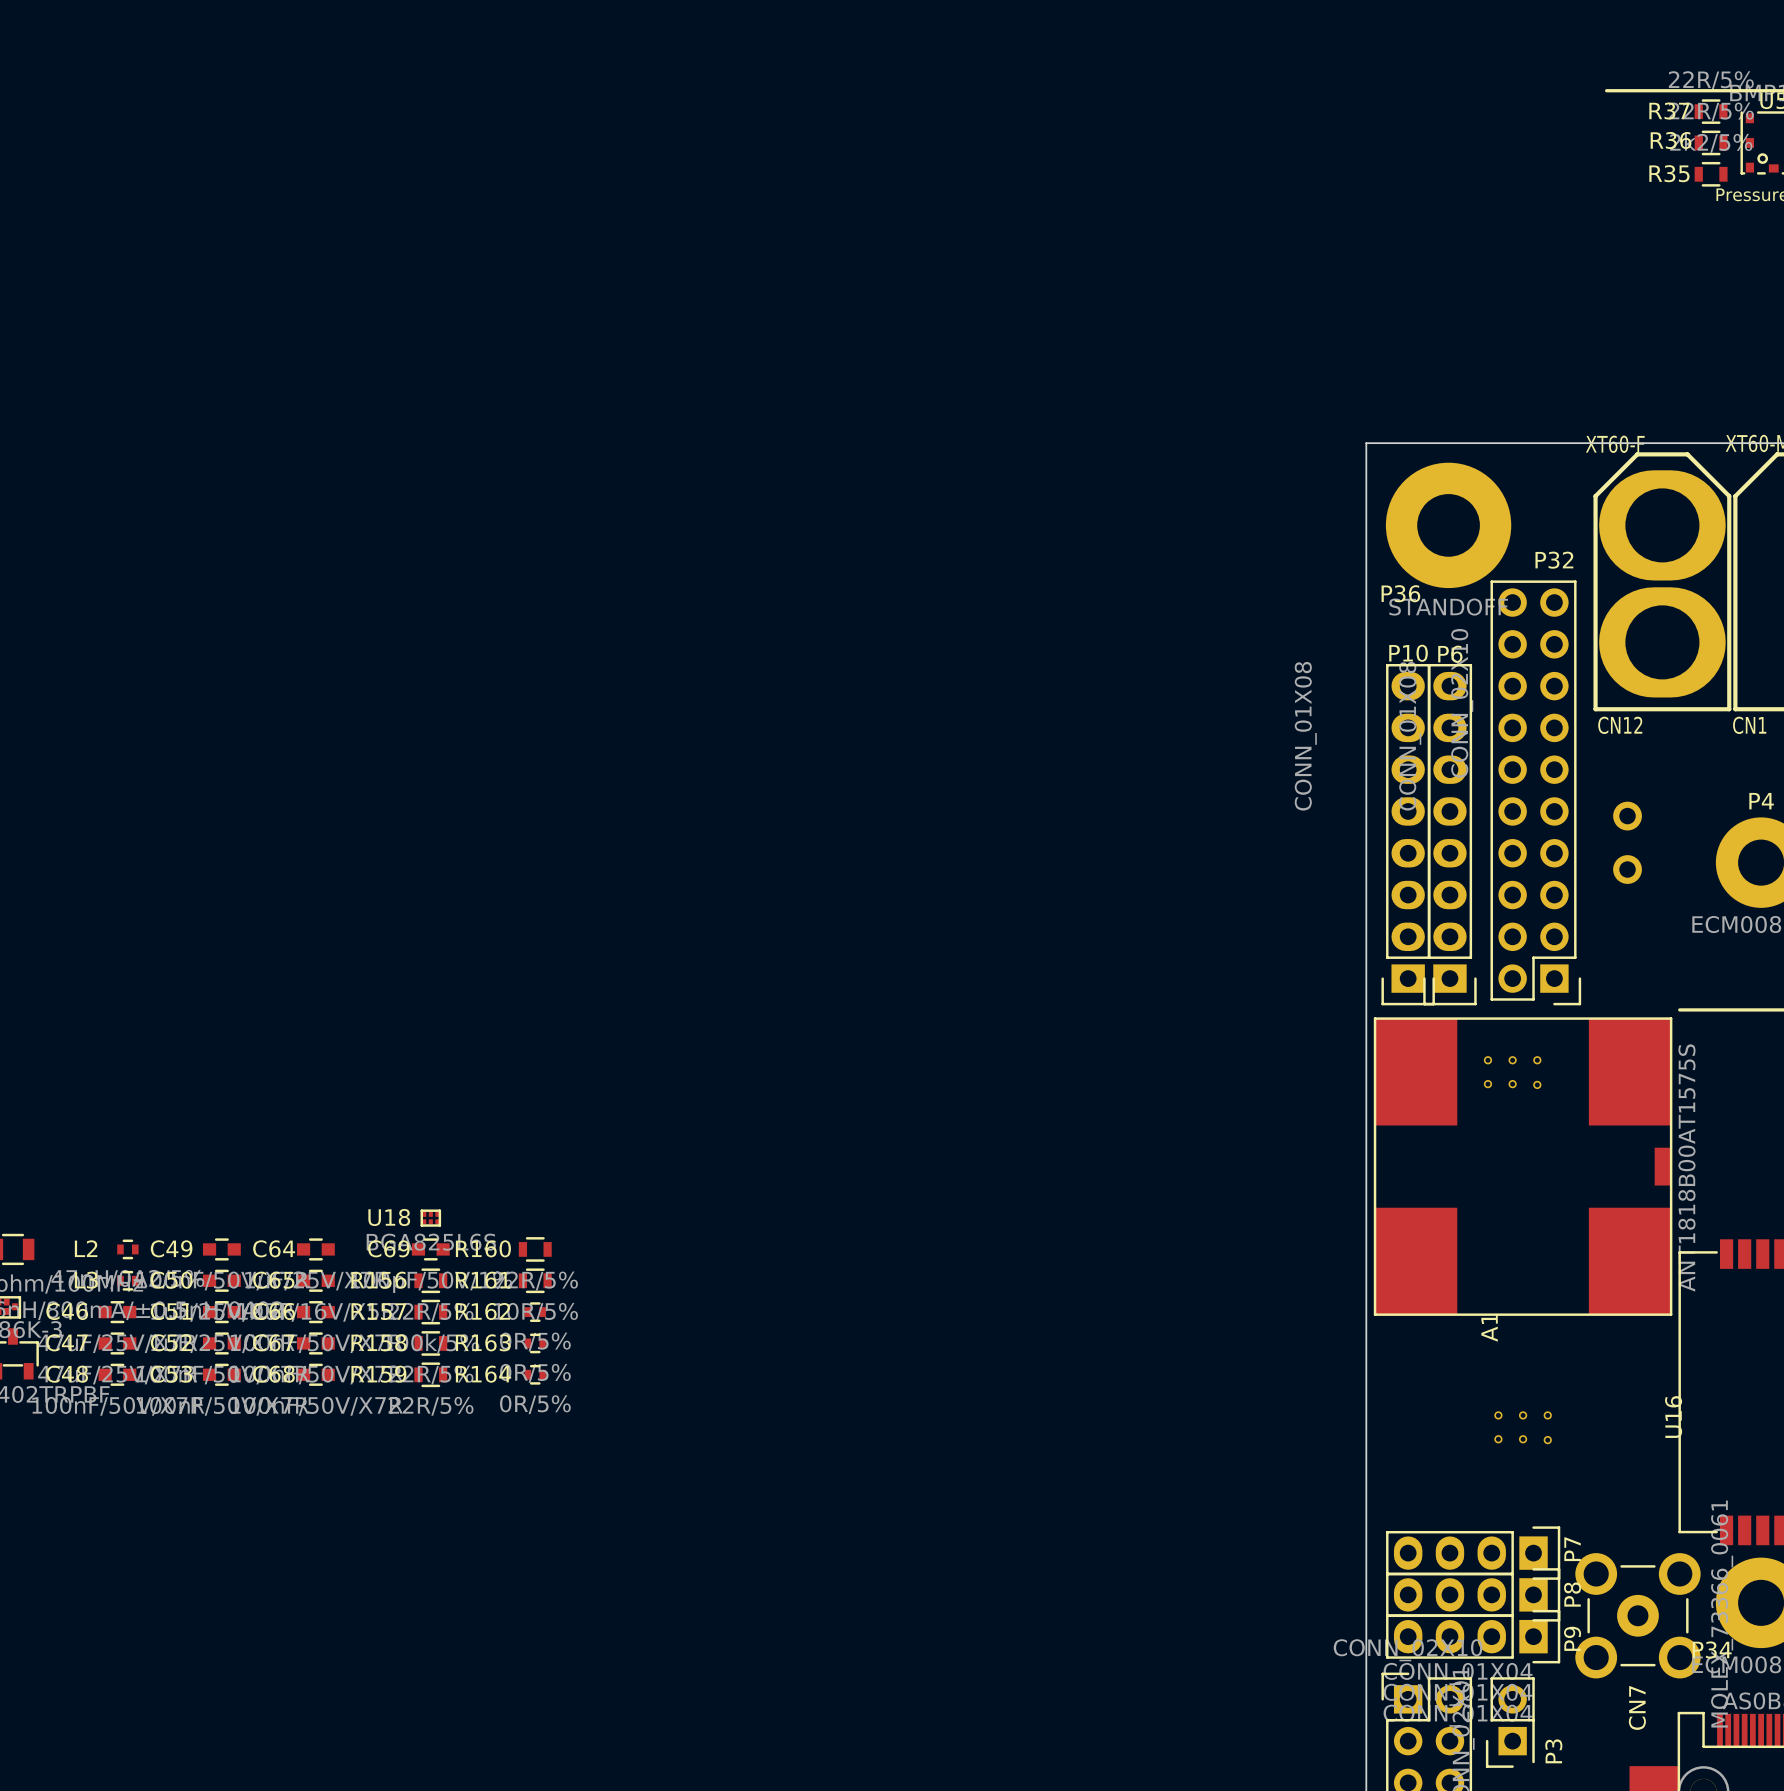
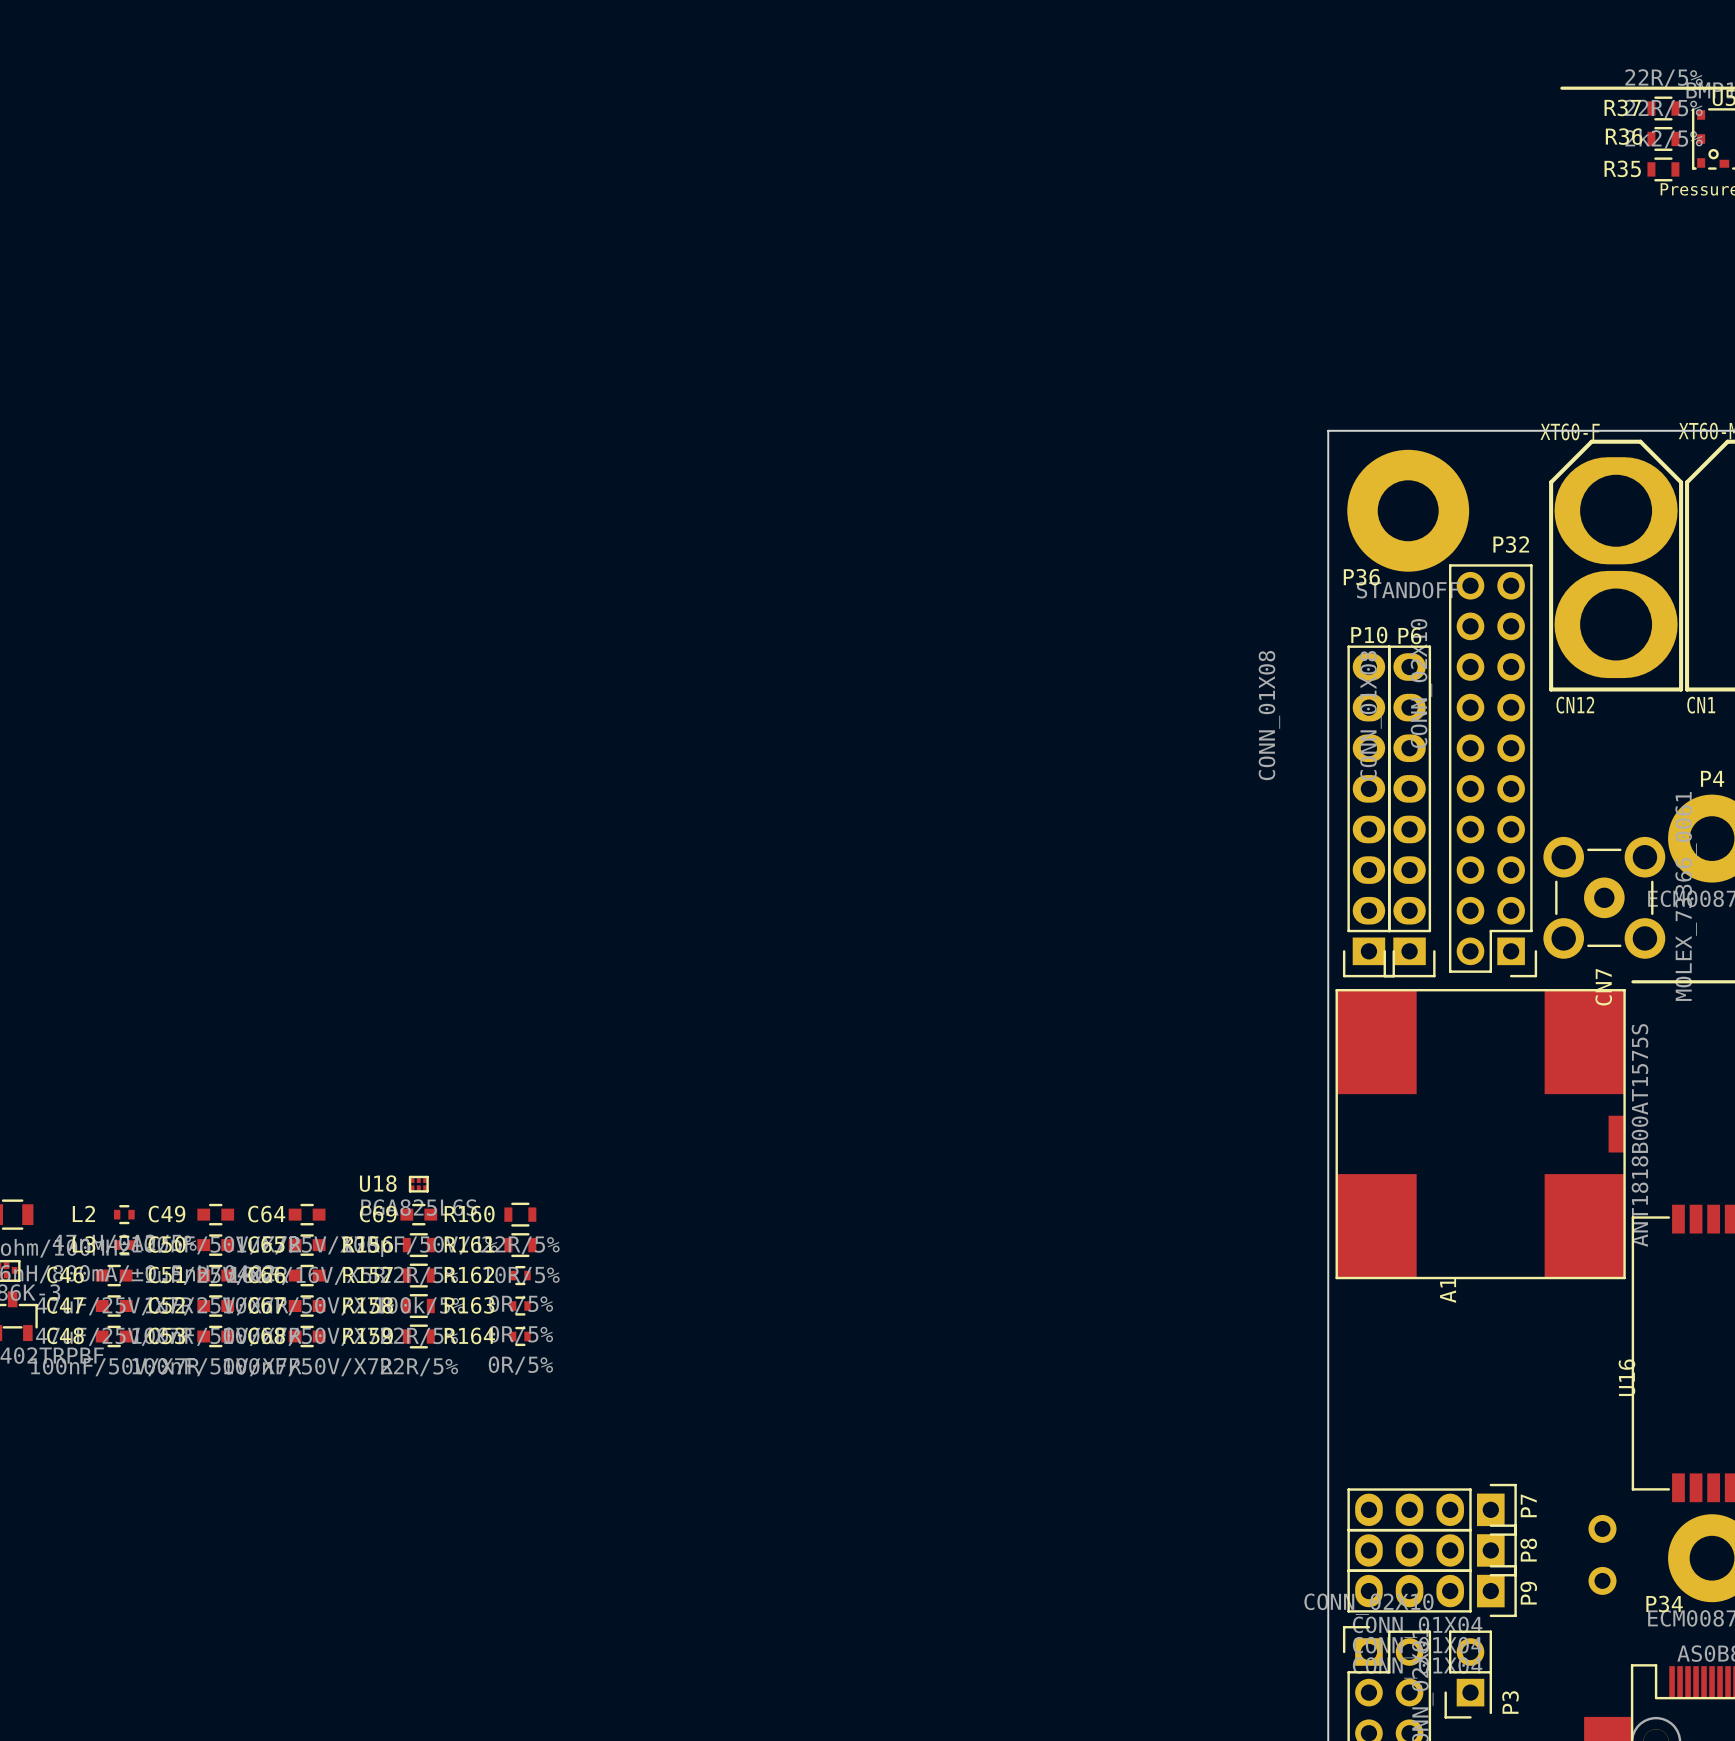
part: (1627, 842) -> none
part: (1512, 1072) -> none
part: (1523, 1427) -> none
part: none -> (1602, 1554)
CN7 position: (1637, 1615) -> (1604, 897)

